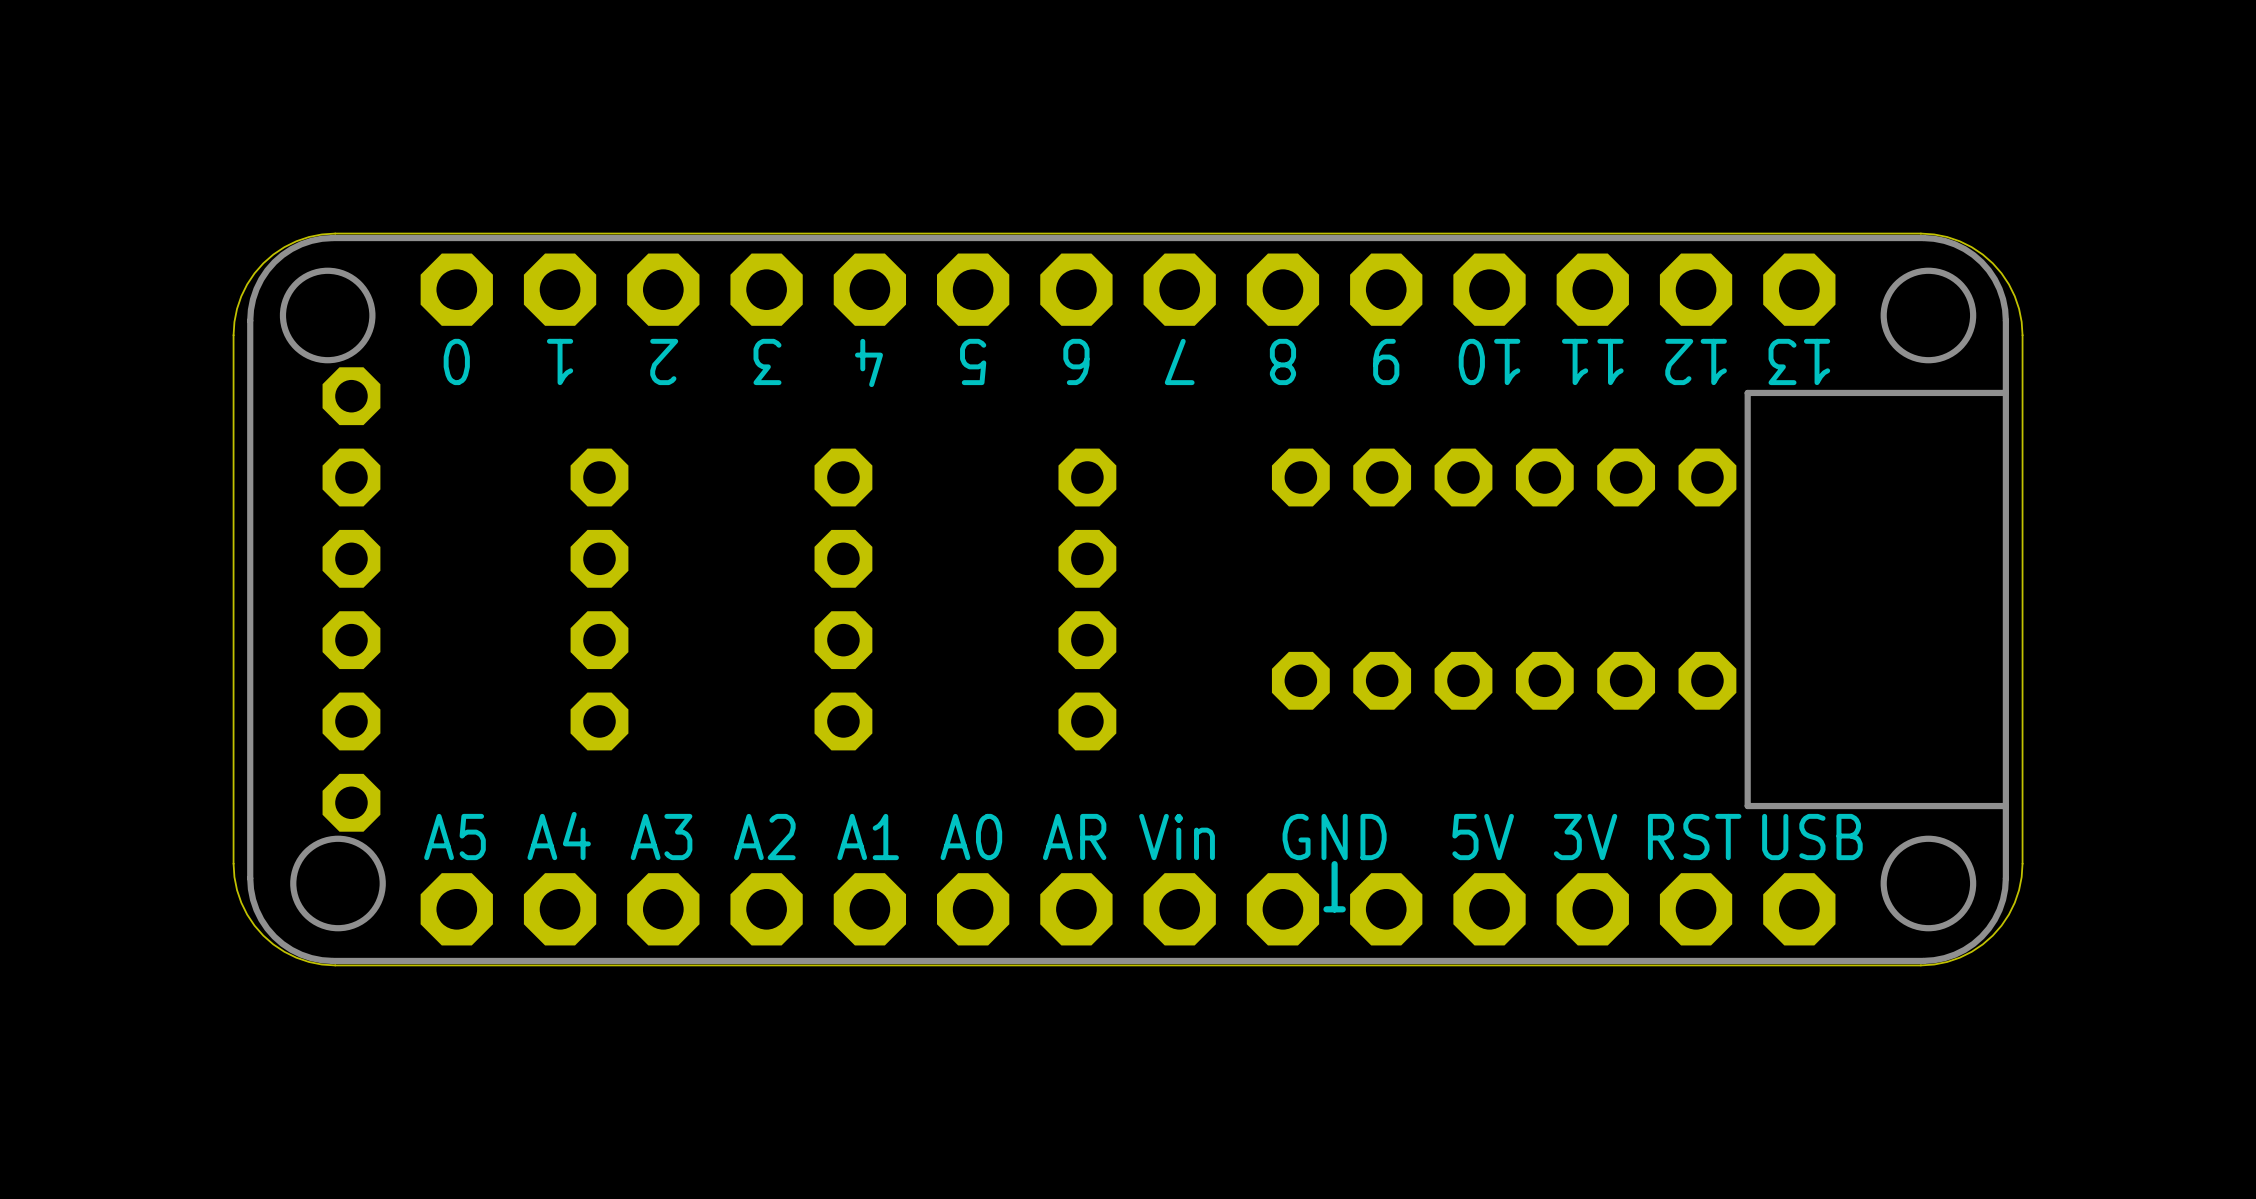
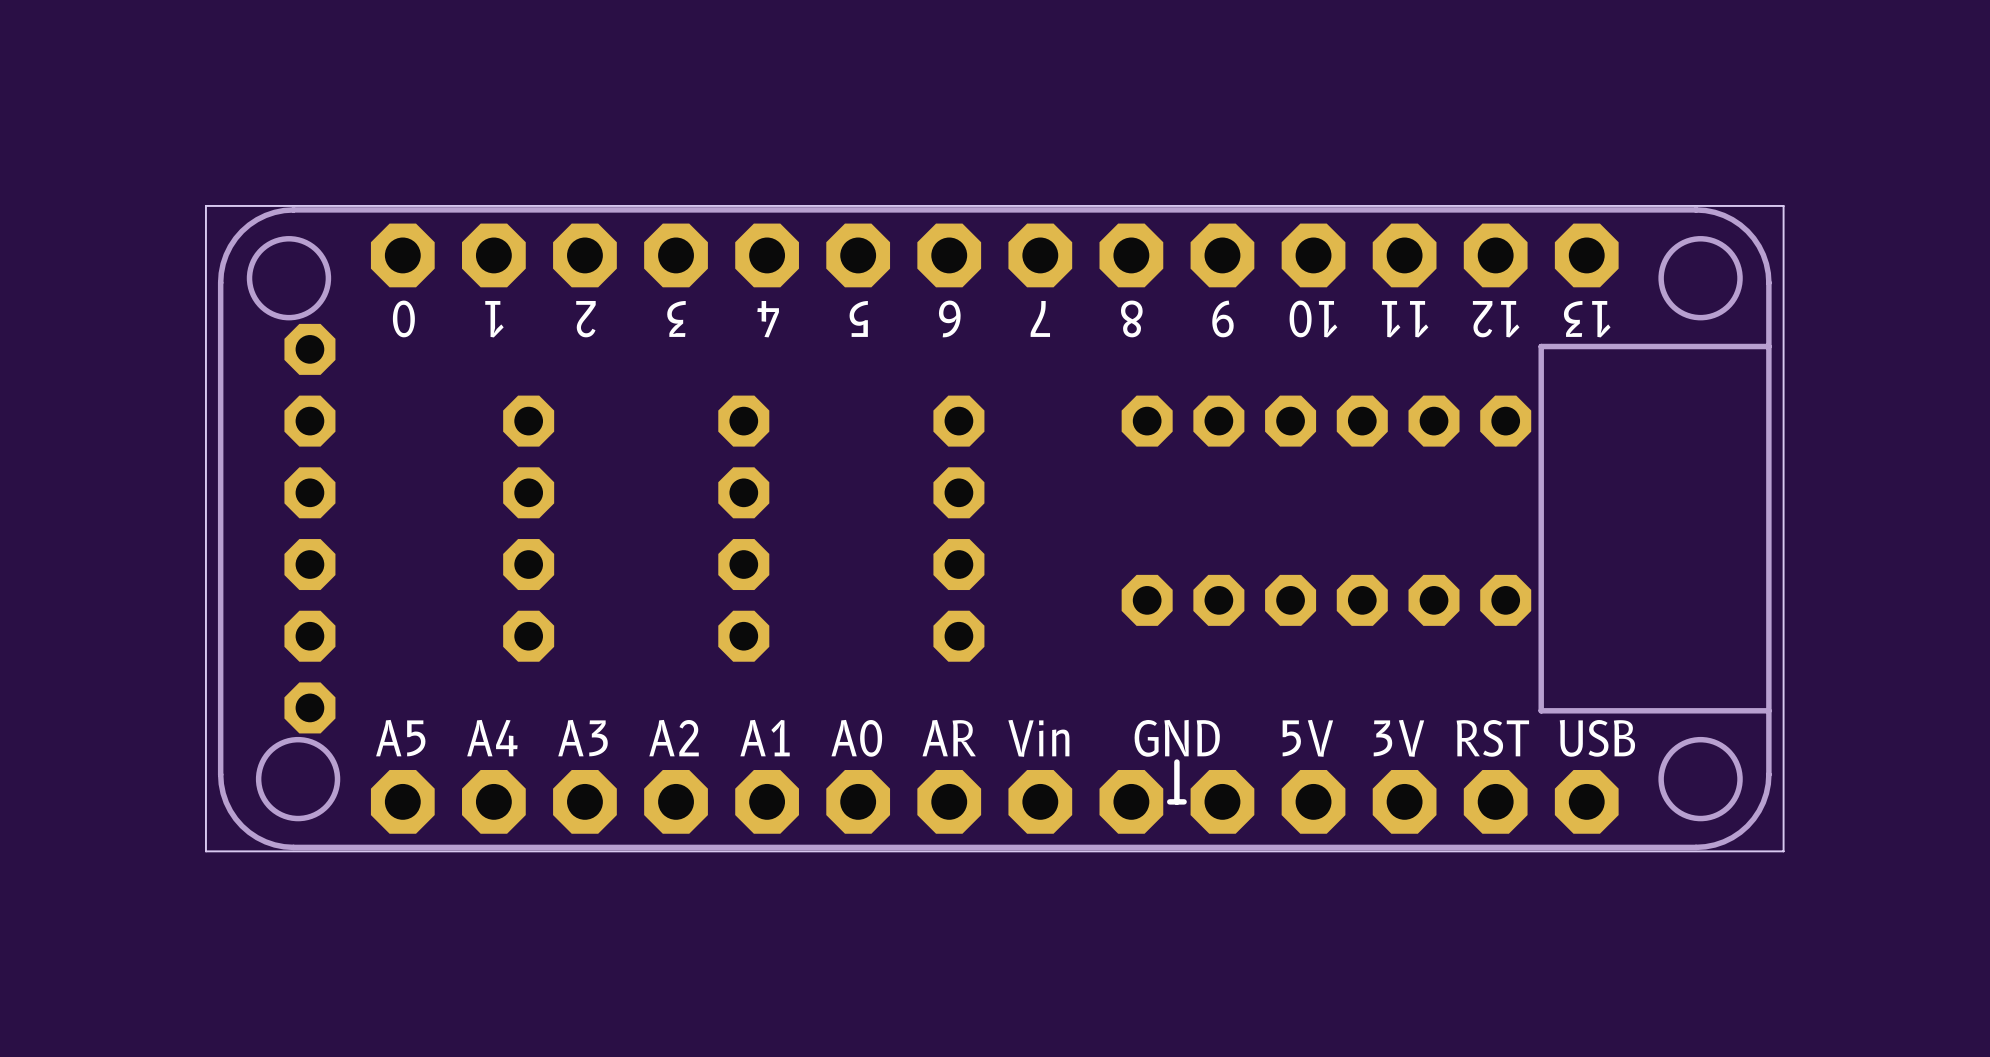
board edge: (335, 233) (321, 234) (296, 241) (284, 247) (263, 263) (247, 284) (241, 296) (234, 321) (233, 335) -> (295, 205) (205, 205) (205, 295)
board edge: (1920, 233) (1934, 234) (1959, 241) (1971, 247) (1992, 263) (2008, 284) (2014, 296) (2021, 321) (2022, 335) -> (1693, 205) (1783, 205) (1783, 295)
board edge: (233, 863) (234, 877) (241, 902) (247, 914) (263, 935) (284, 951) (296, 957) (321, 964) (335, 965) -> (205, 761) (205, 851) (295, 851)
board edge: (2022, 863) (2021, 877) (2014, 902) (2008, 914) (1992, 935) (1971, 951) (1959, 957) (1934, 964) (1920, 965) -> (1783, 761) (1783, 851) (1693, 851)

